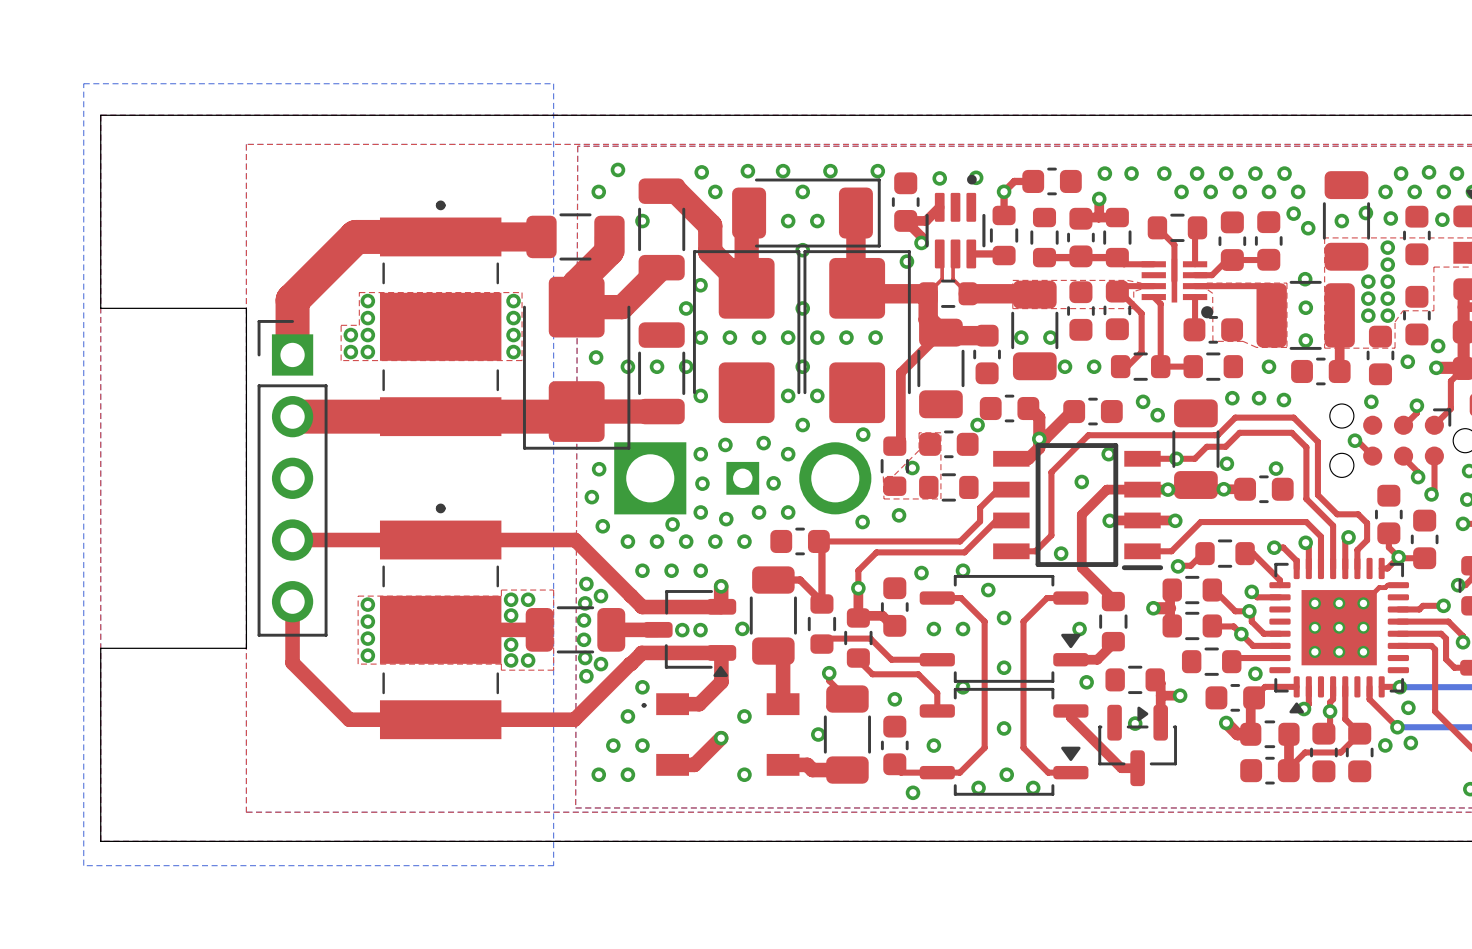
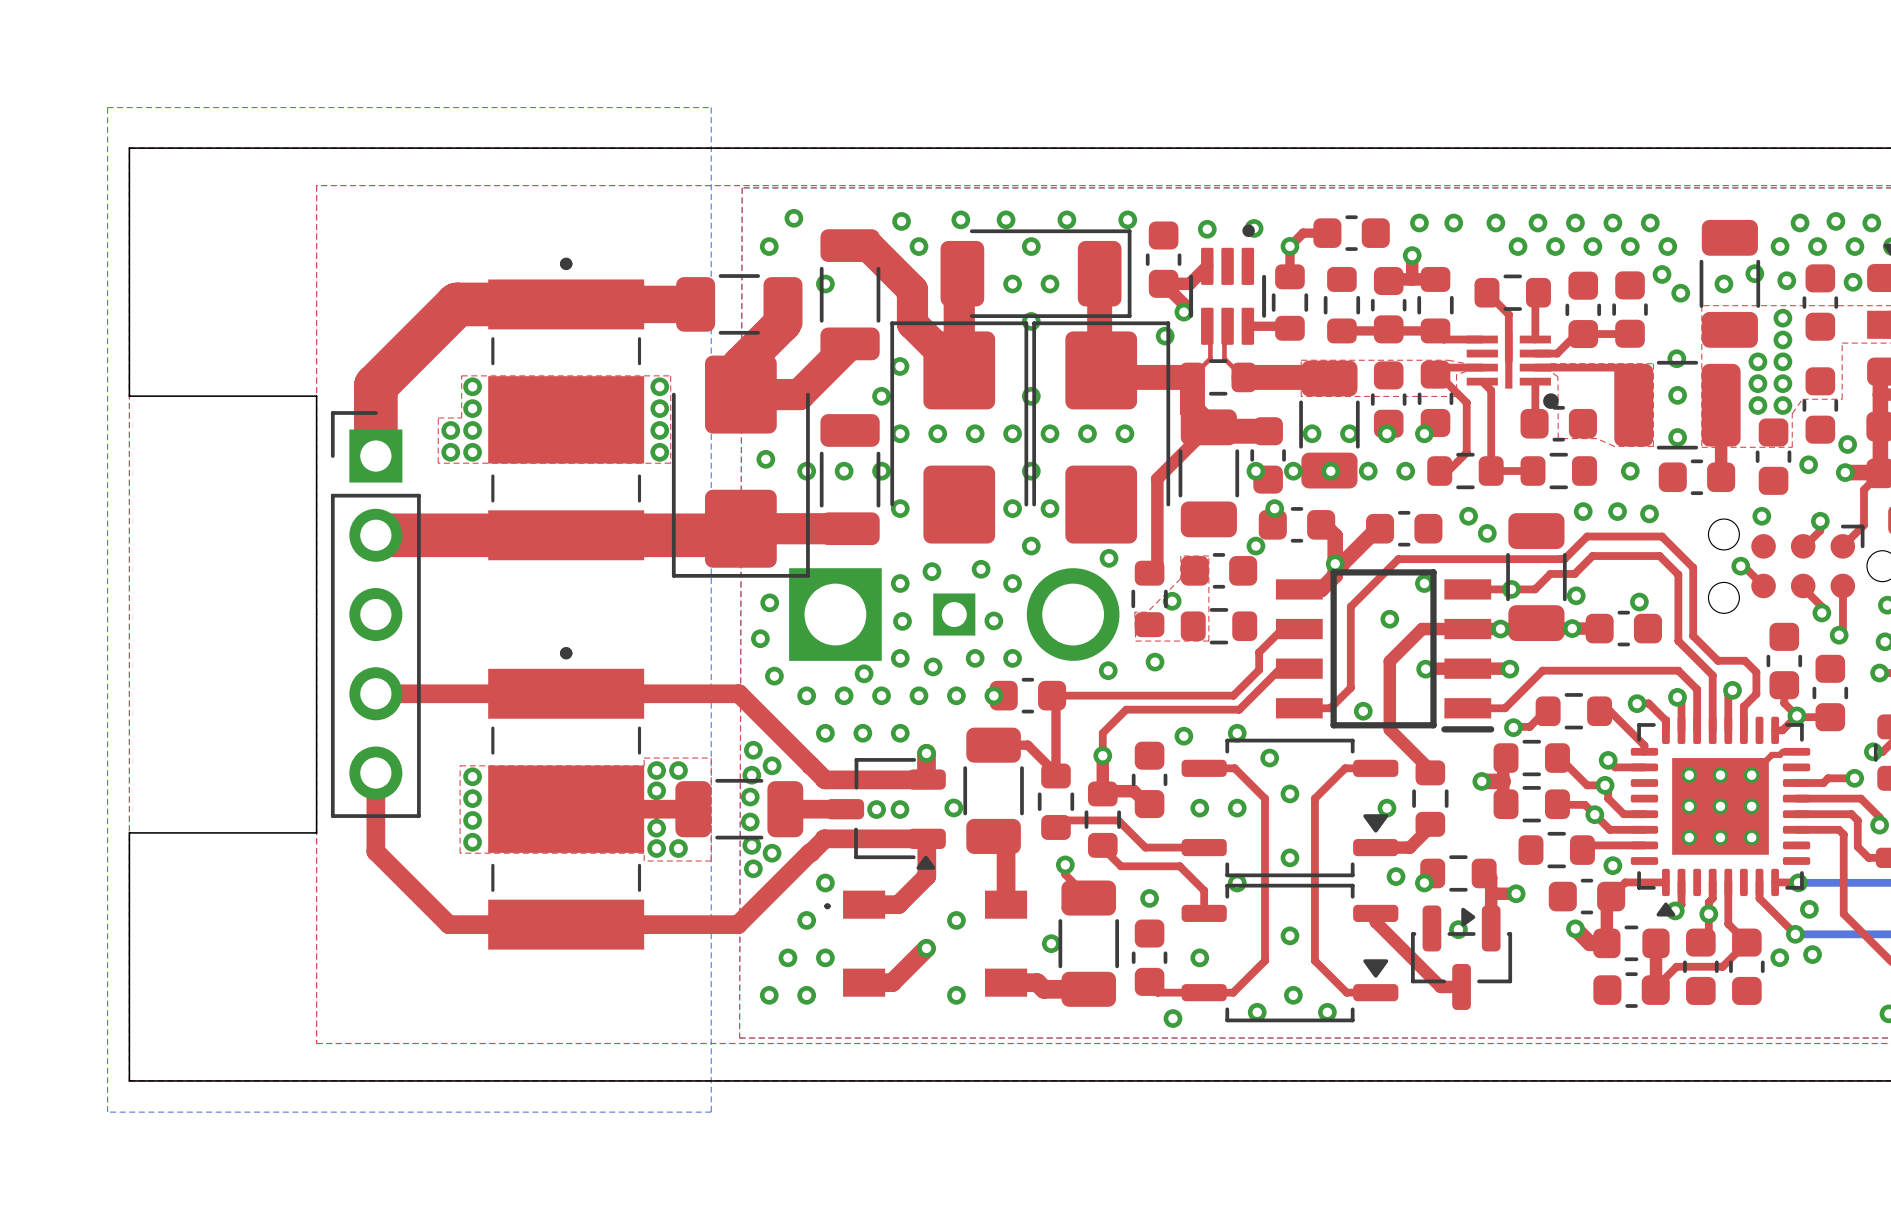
via: none -> (1386, 433)
via: none -> (1424, 433)
via: none -> (1255, 471)
via: none -> (1293, 471)
via: none -> (1330, 471)
via: none -> (1274, 508)
via: none -> (993, 695)
via: none -> (1424, 883)

